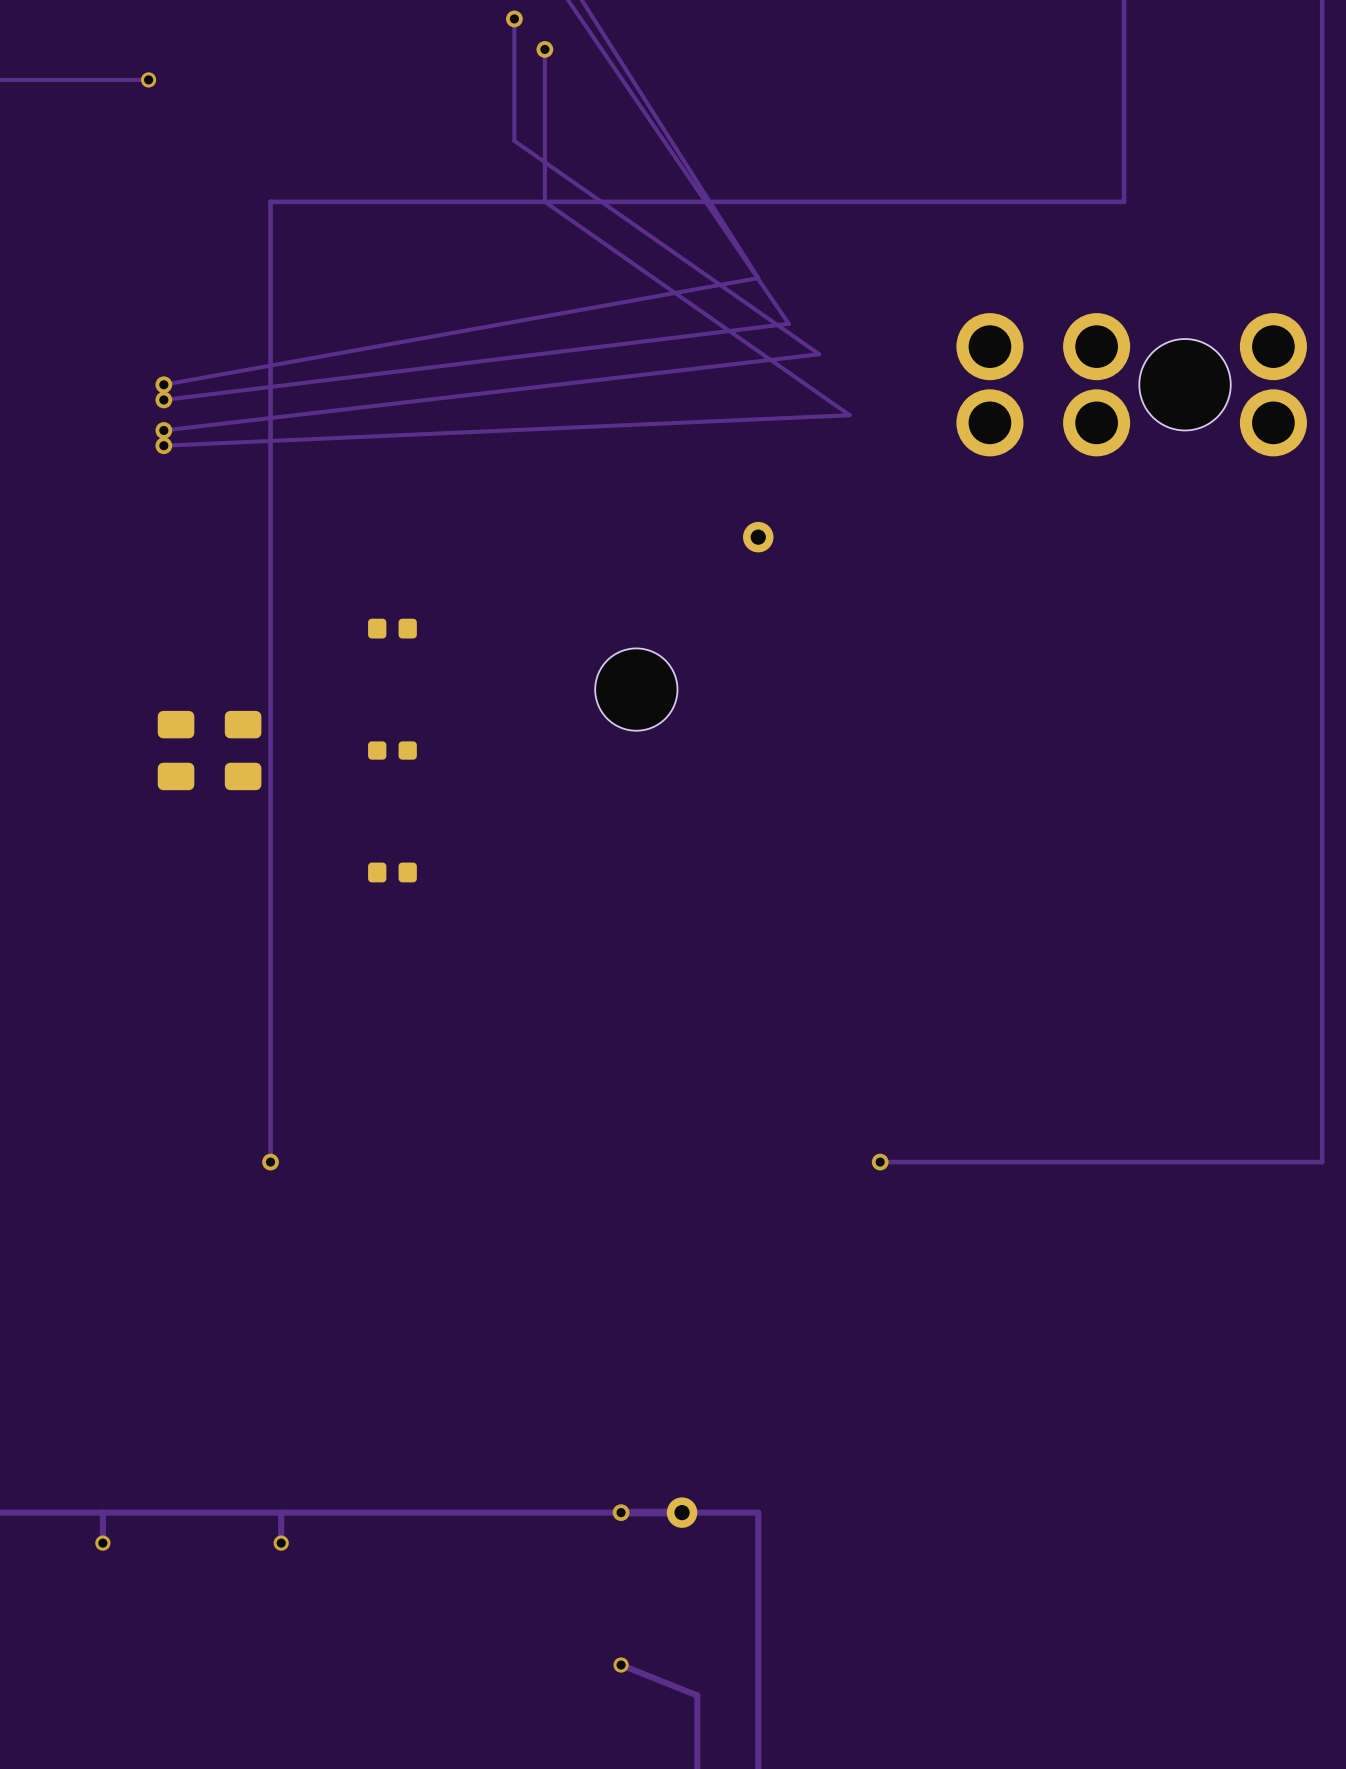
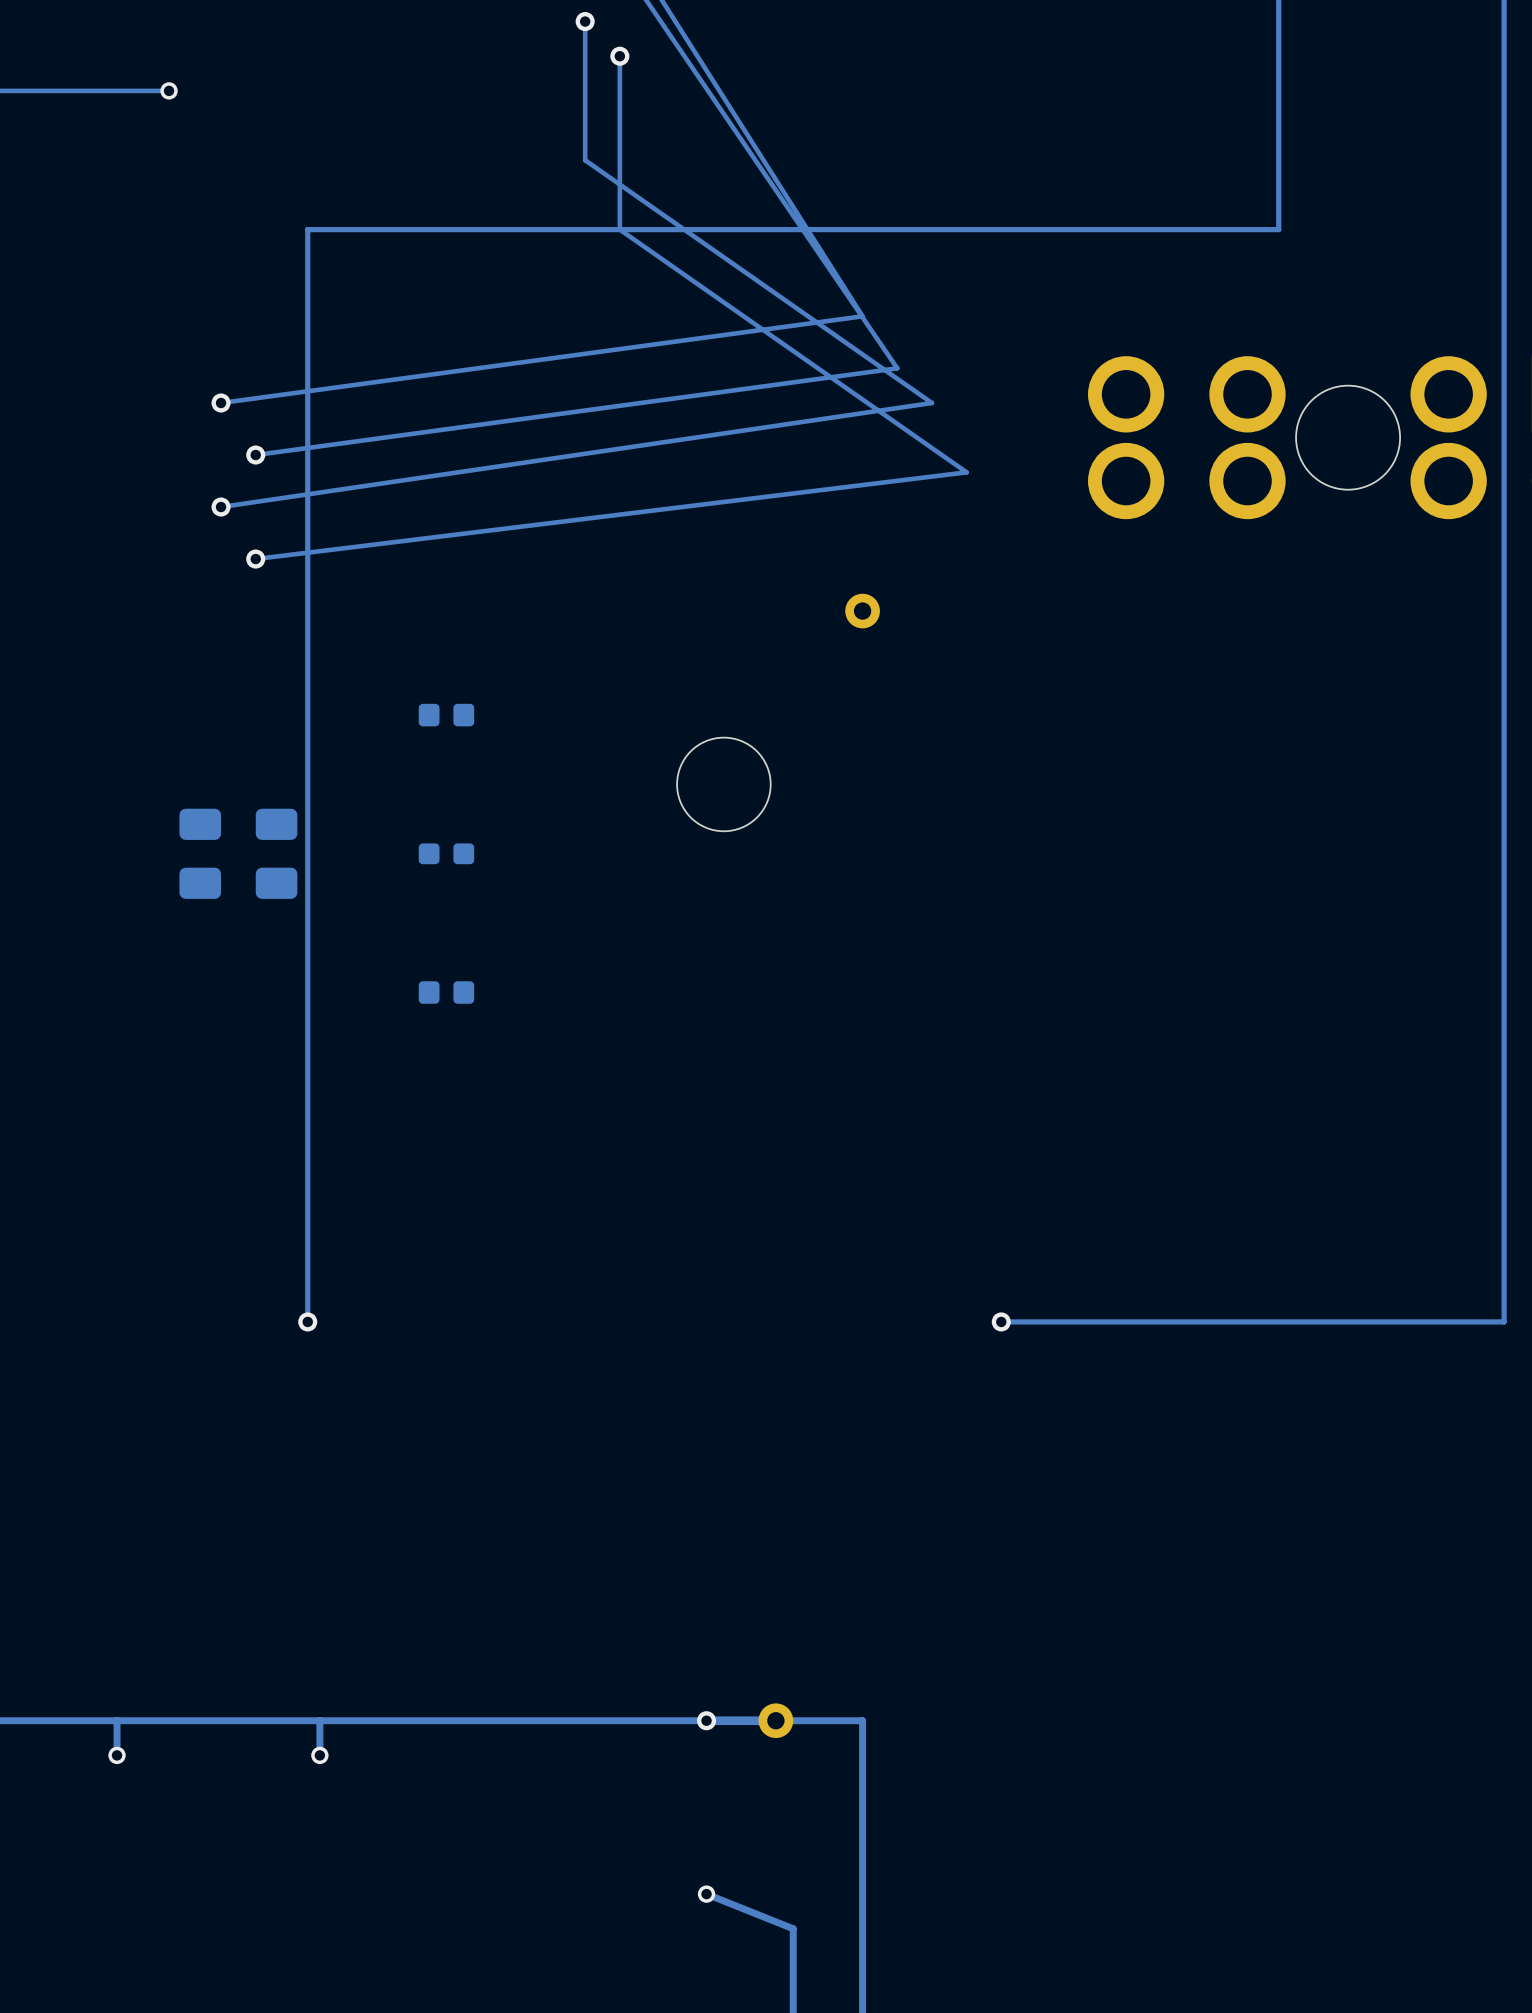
track: (758, 278) (163, 384) -> (862, 316) (221, 403)
track: (788, 323) (163, 399) -> (897, 368) (255, 455)
via: none -> (221, 403)
track: (819, 354) (163, 430) -> (931, 403) (221, 507)
via: (163, 384) -> none
via: (163, 399) -> none
via: none -> (255, 455)
track: (849, 415) (163, 445) -> (966, 472) (255, 559)
via: (163, 430) -> none
via: (163, 445) -> none
via: none -> (221, 507)
via: none -> (255, 559)

